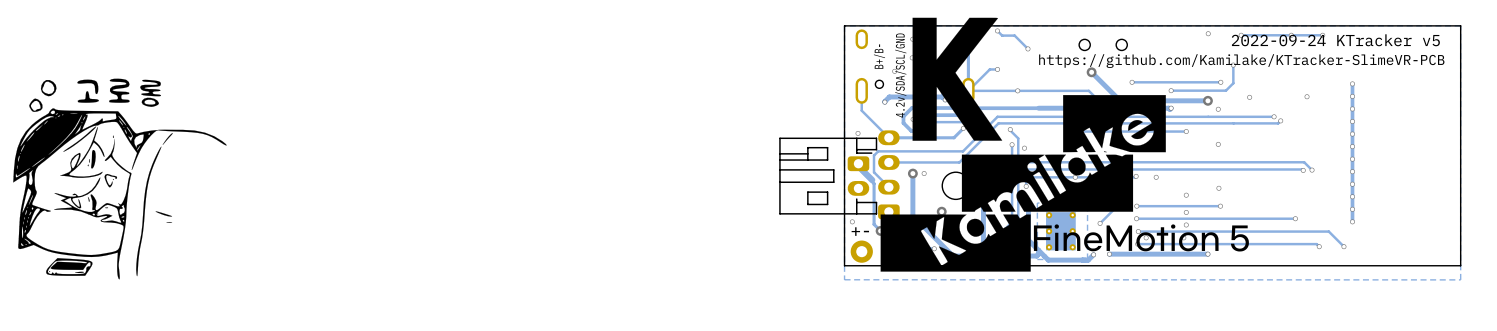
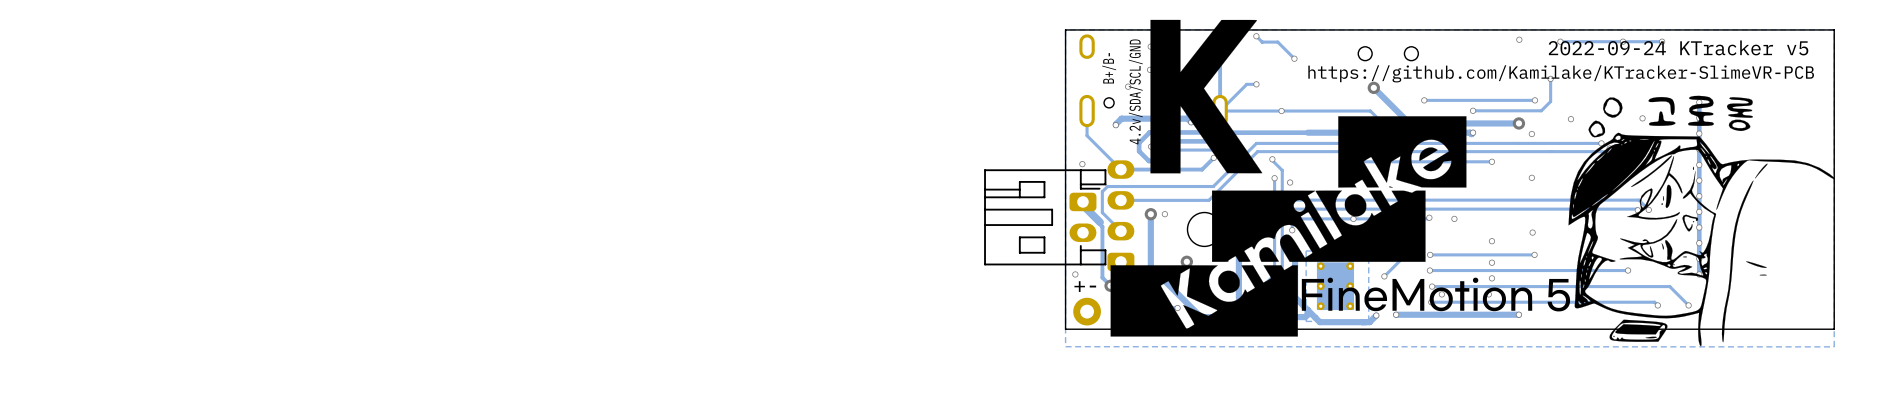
drawing: [13, 78, 227, 280] -> none
drawing: none -> [1568, 95, 1835, 347]

